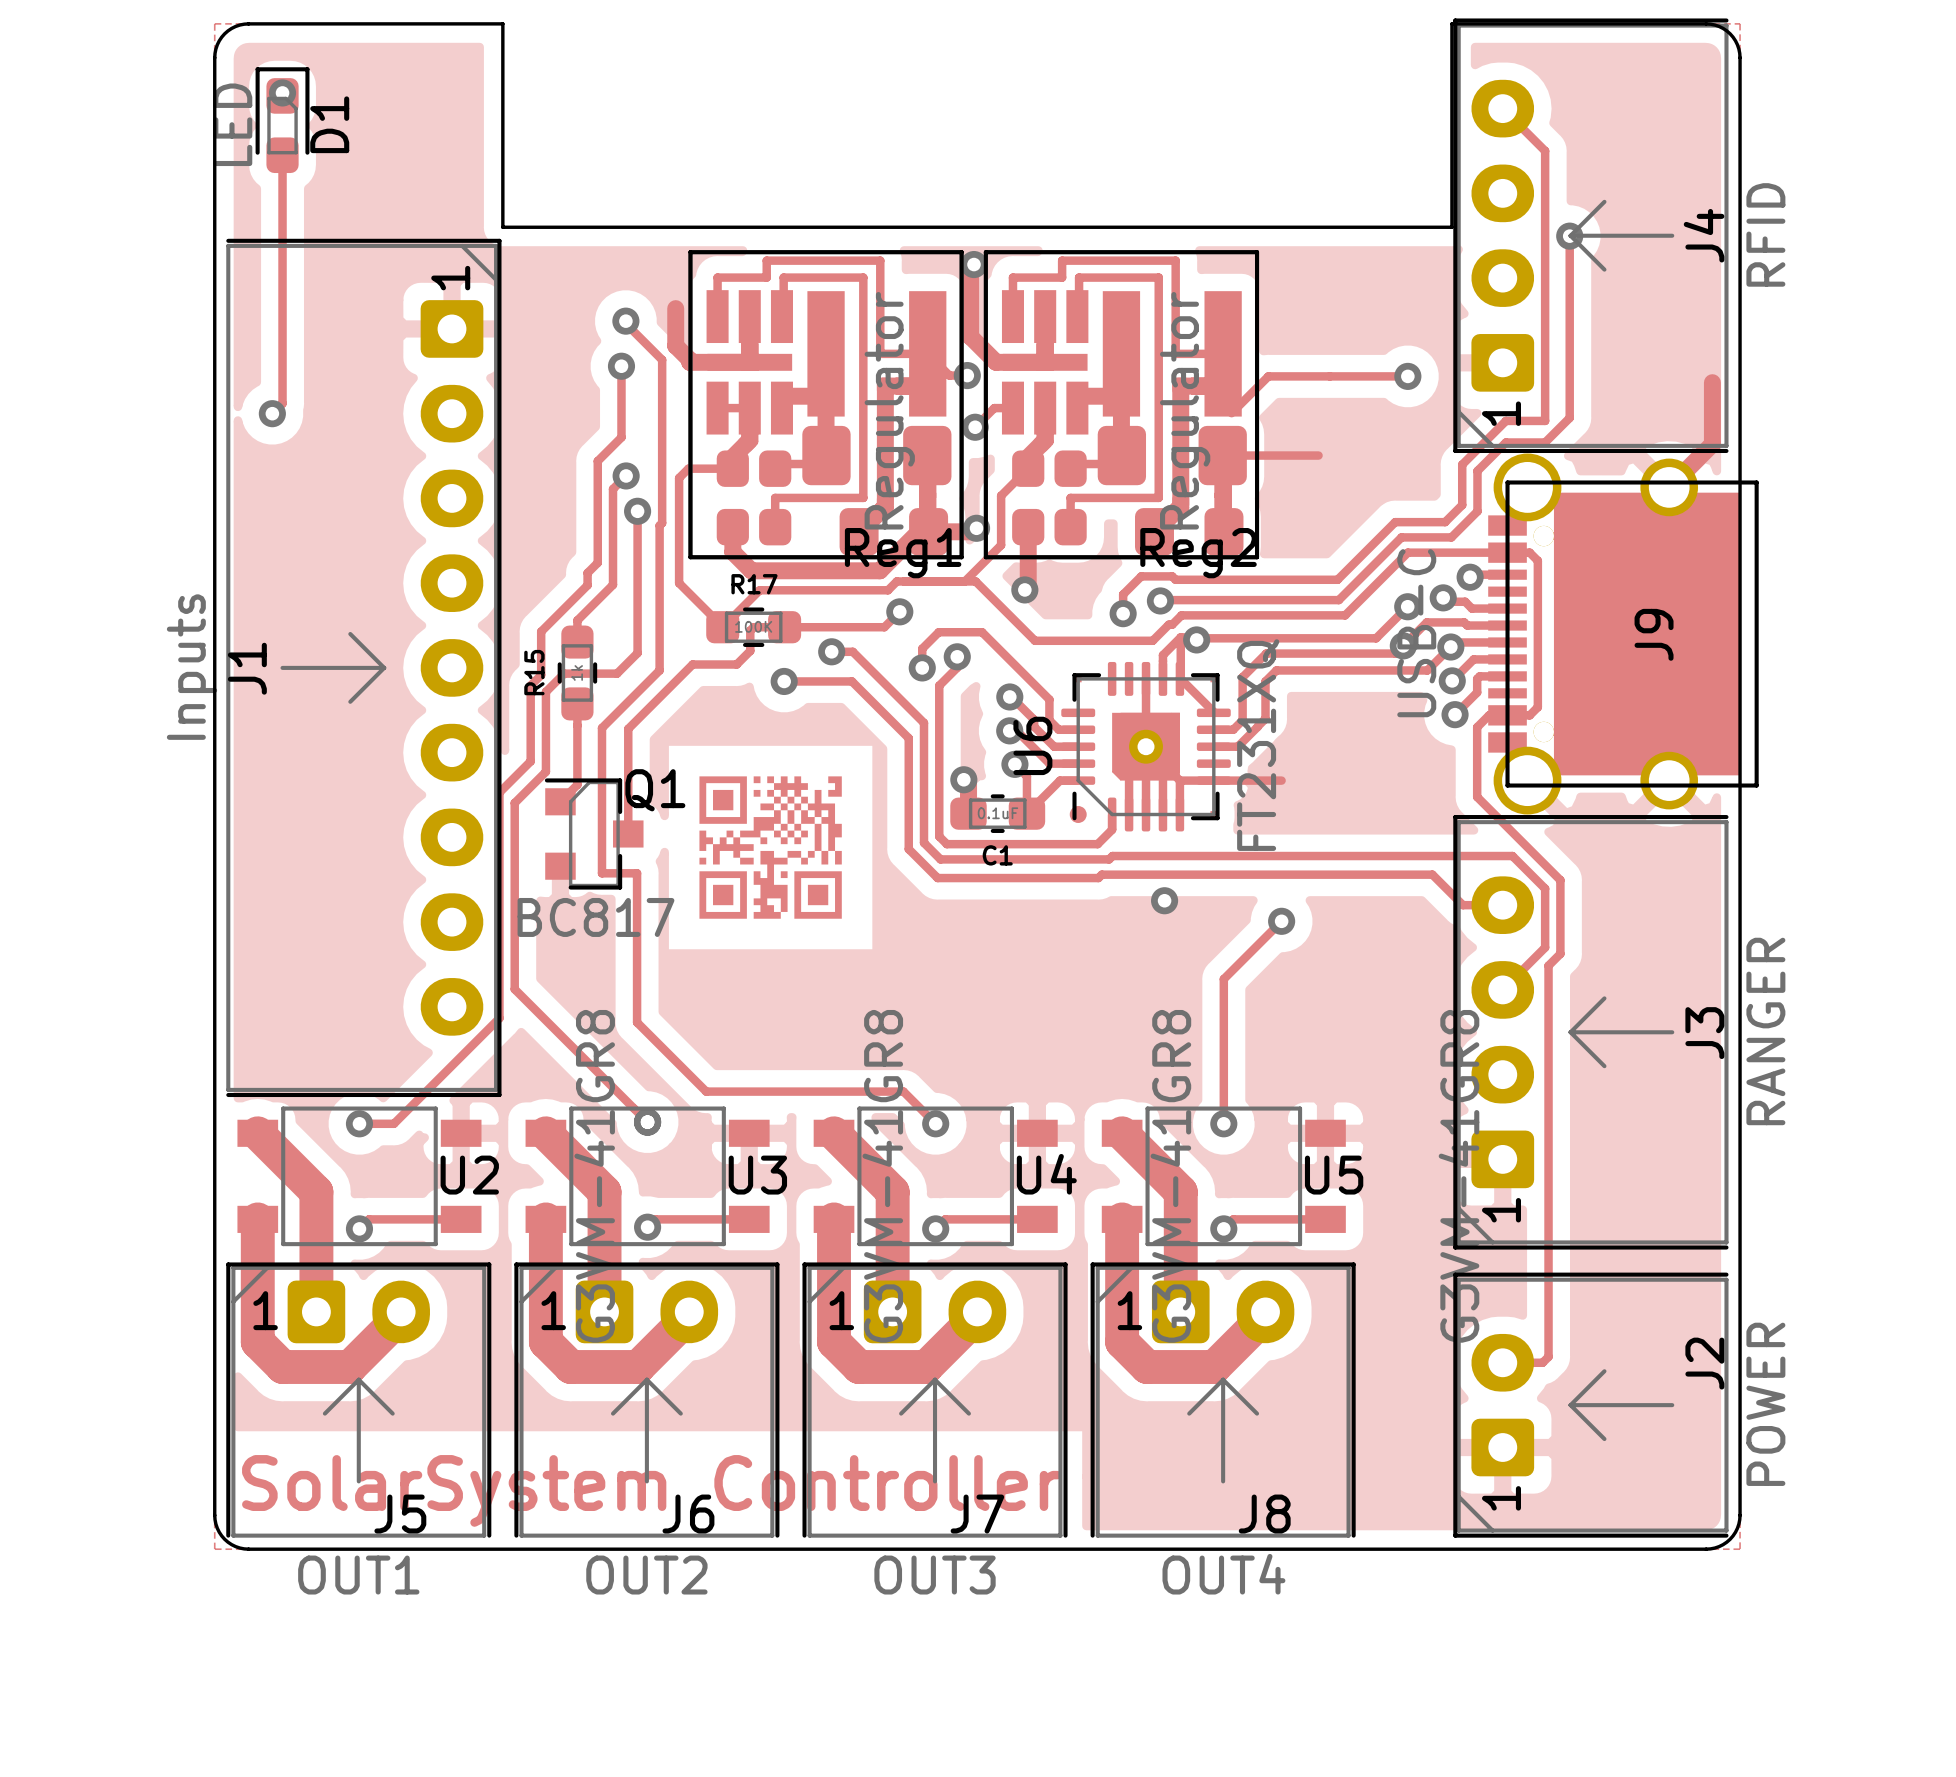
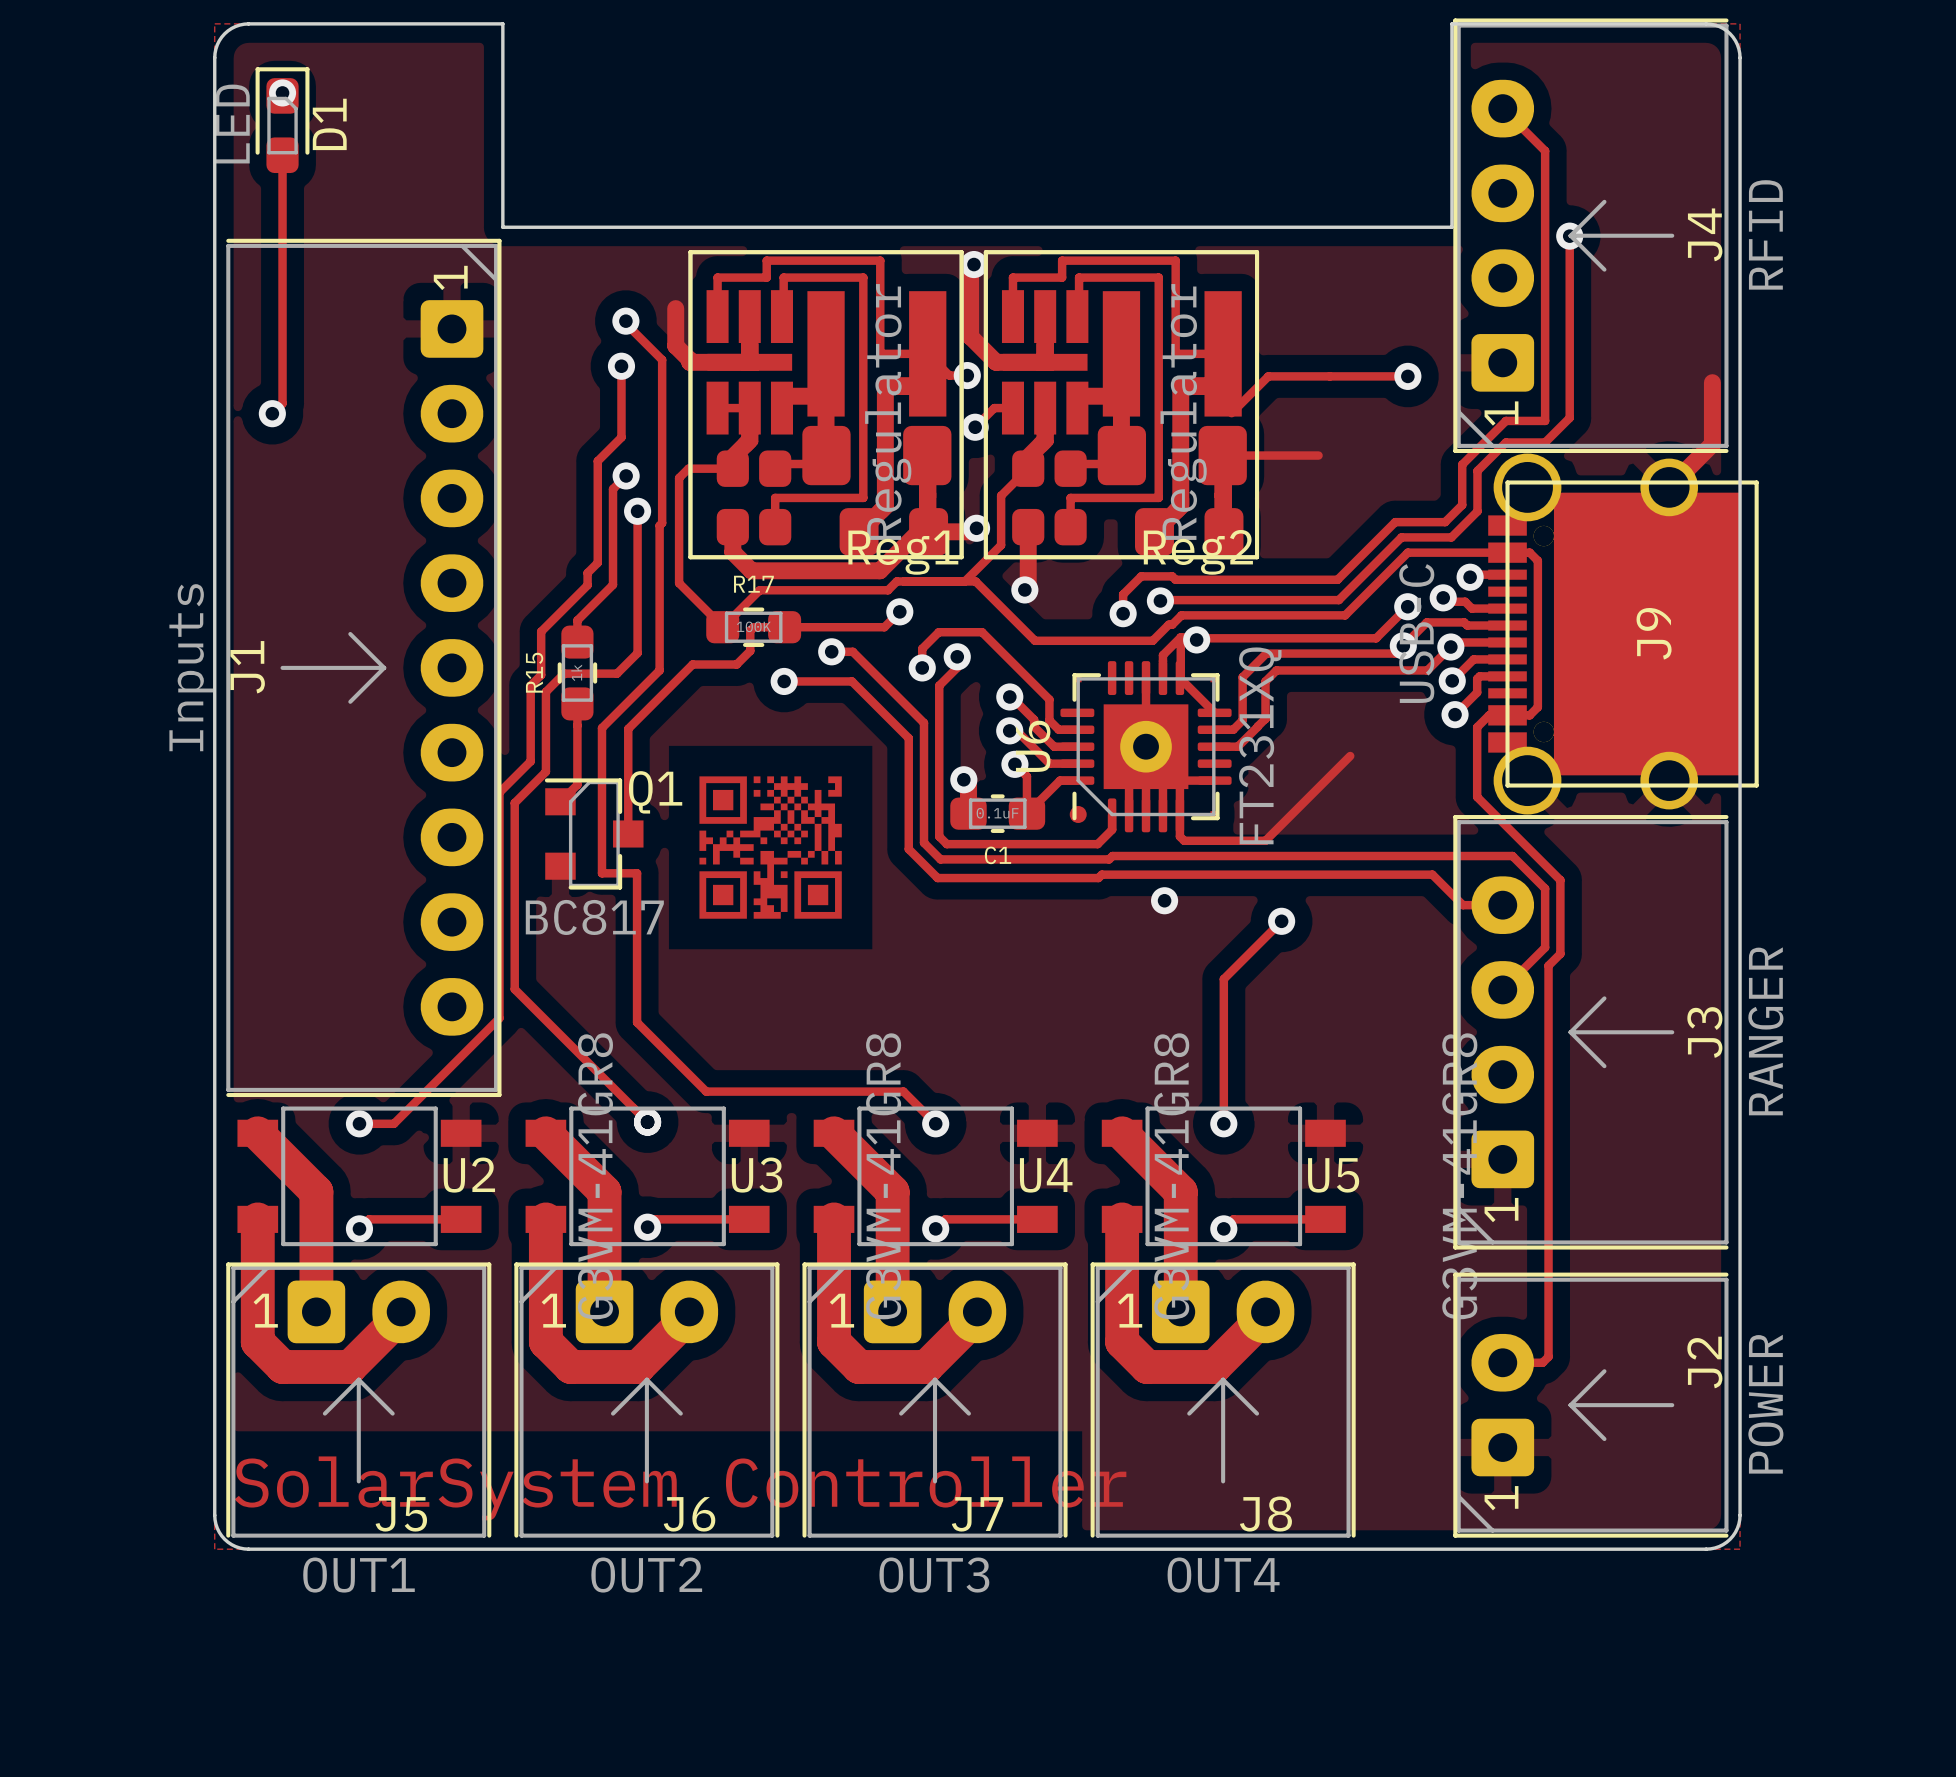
U6 footprint: [1061, 661, 1231, 832] -> [1060, 661, 1232, 833]
track: none -> (1350, 756) (1265, 840) (1184, 840) (1179, 836) (1179, 815)
track: (1214, 780) (1281, 780) -> none

